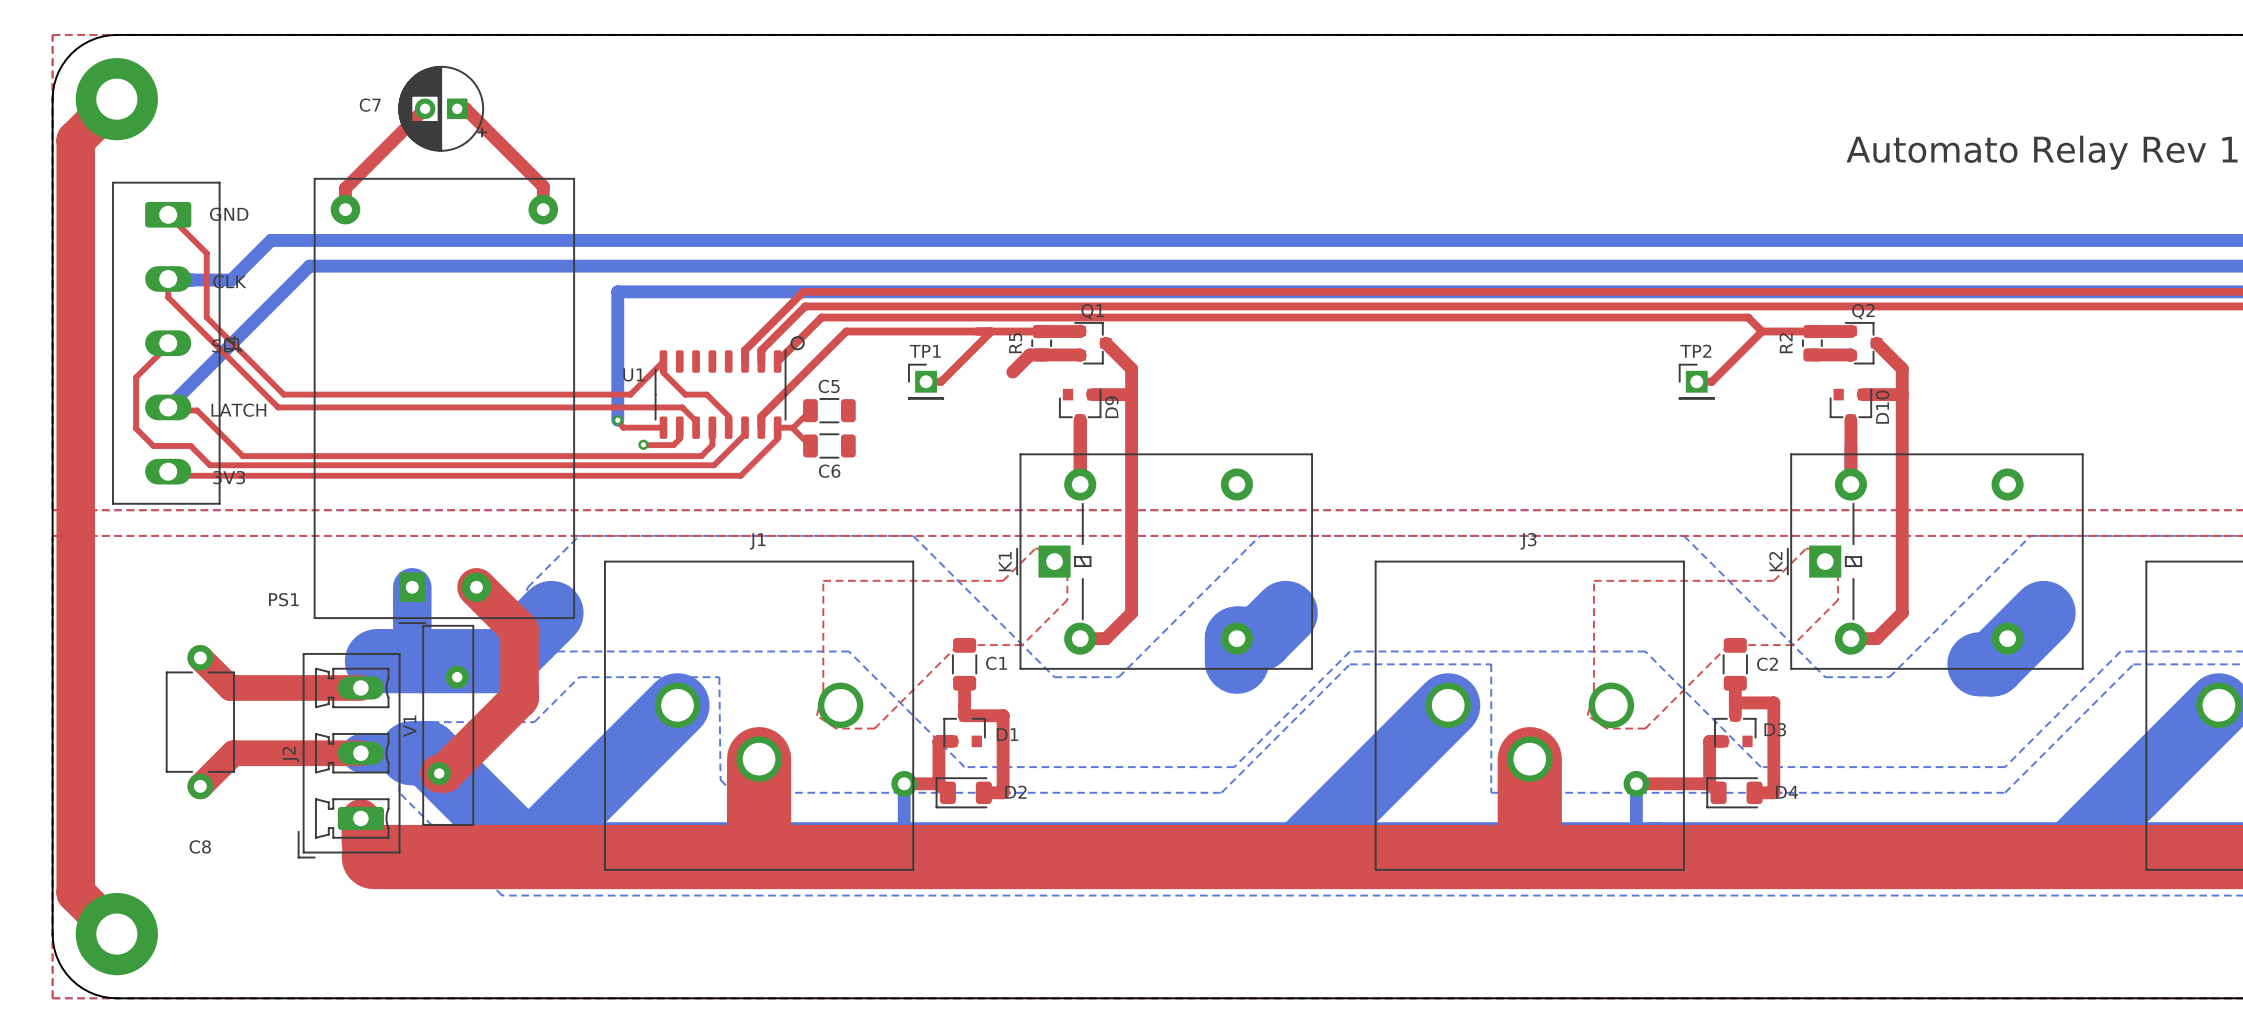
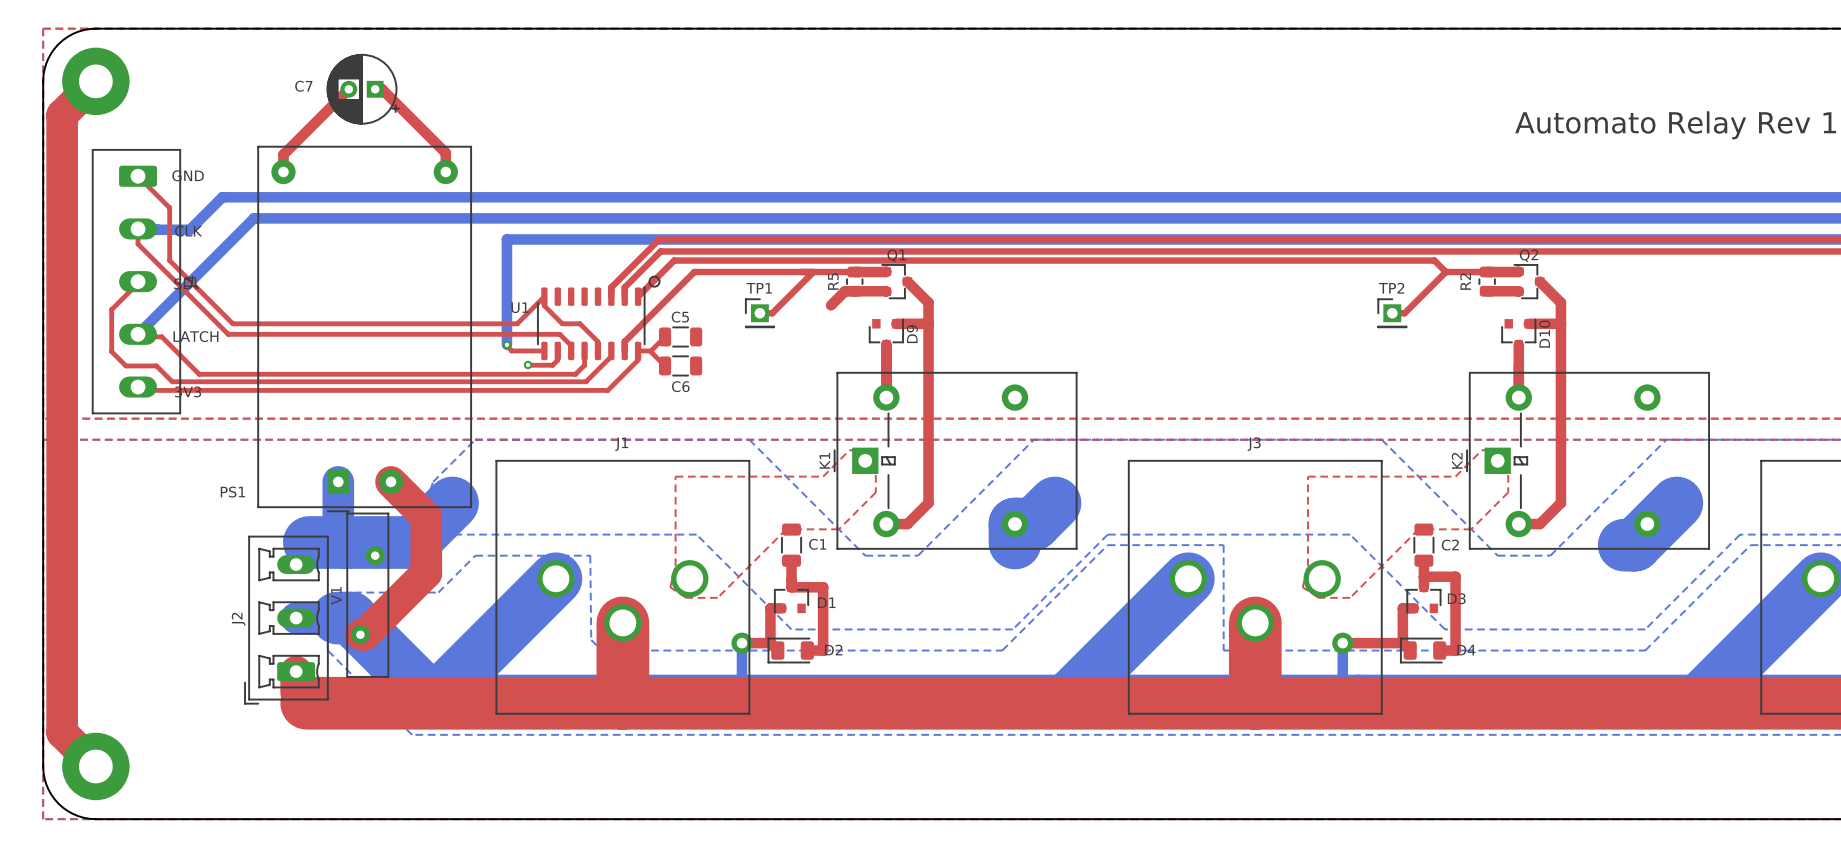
top track: (200, 657) (230, 687) (360, 687) -> none
C8: (200, 722) -> none
top track: (360, 753) (233, 753) (200, 786) -> none

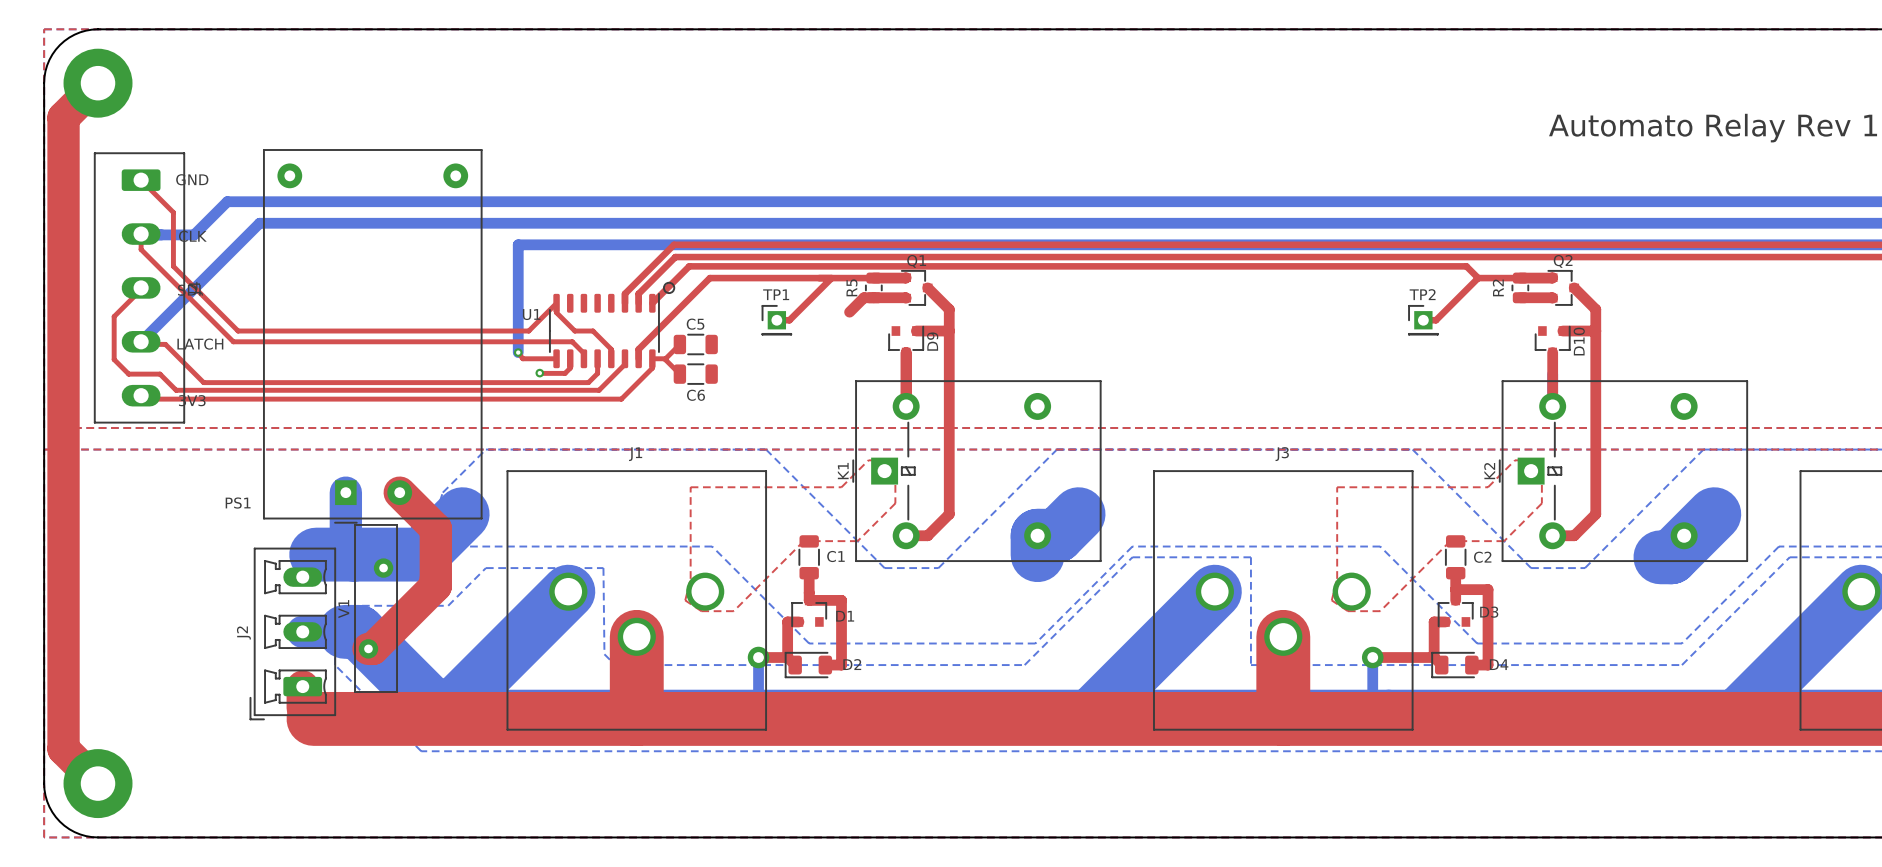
top track: (348, 89) (283, 154) (283, 172) -> none
C7: (363, 89) -> none
top track: (375, 89) (382, 89) (445, 153) (445, 172) -> none

